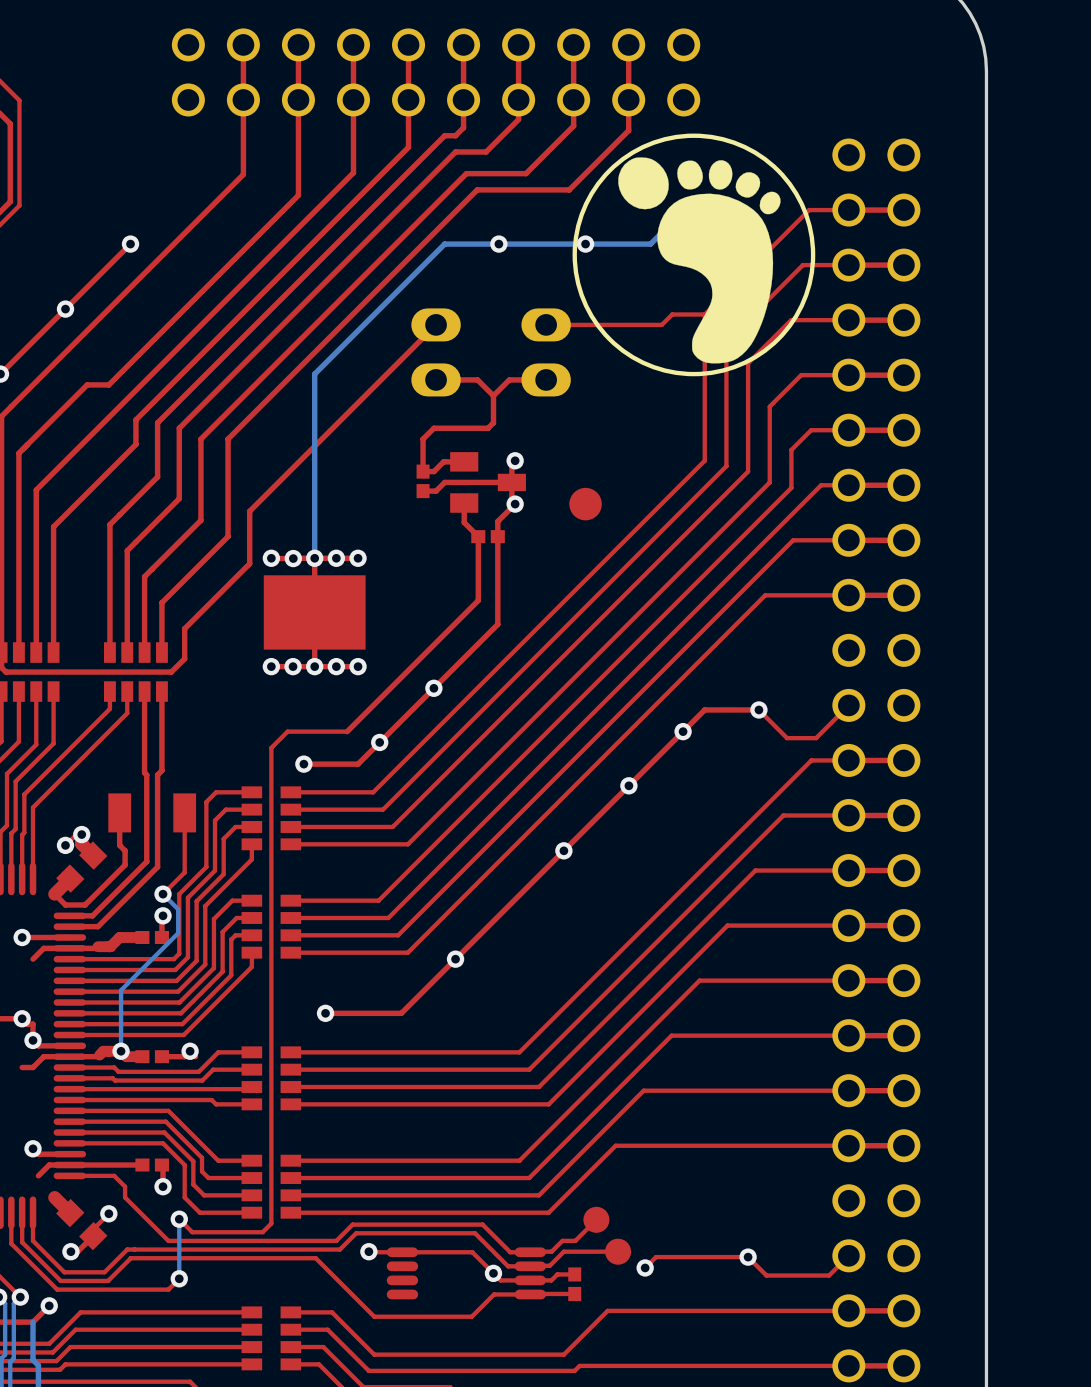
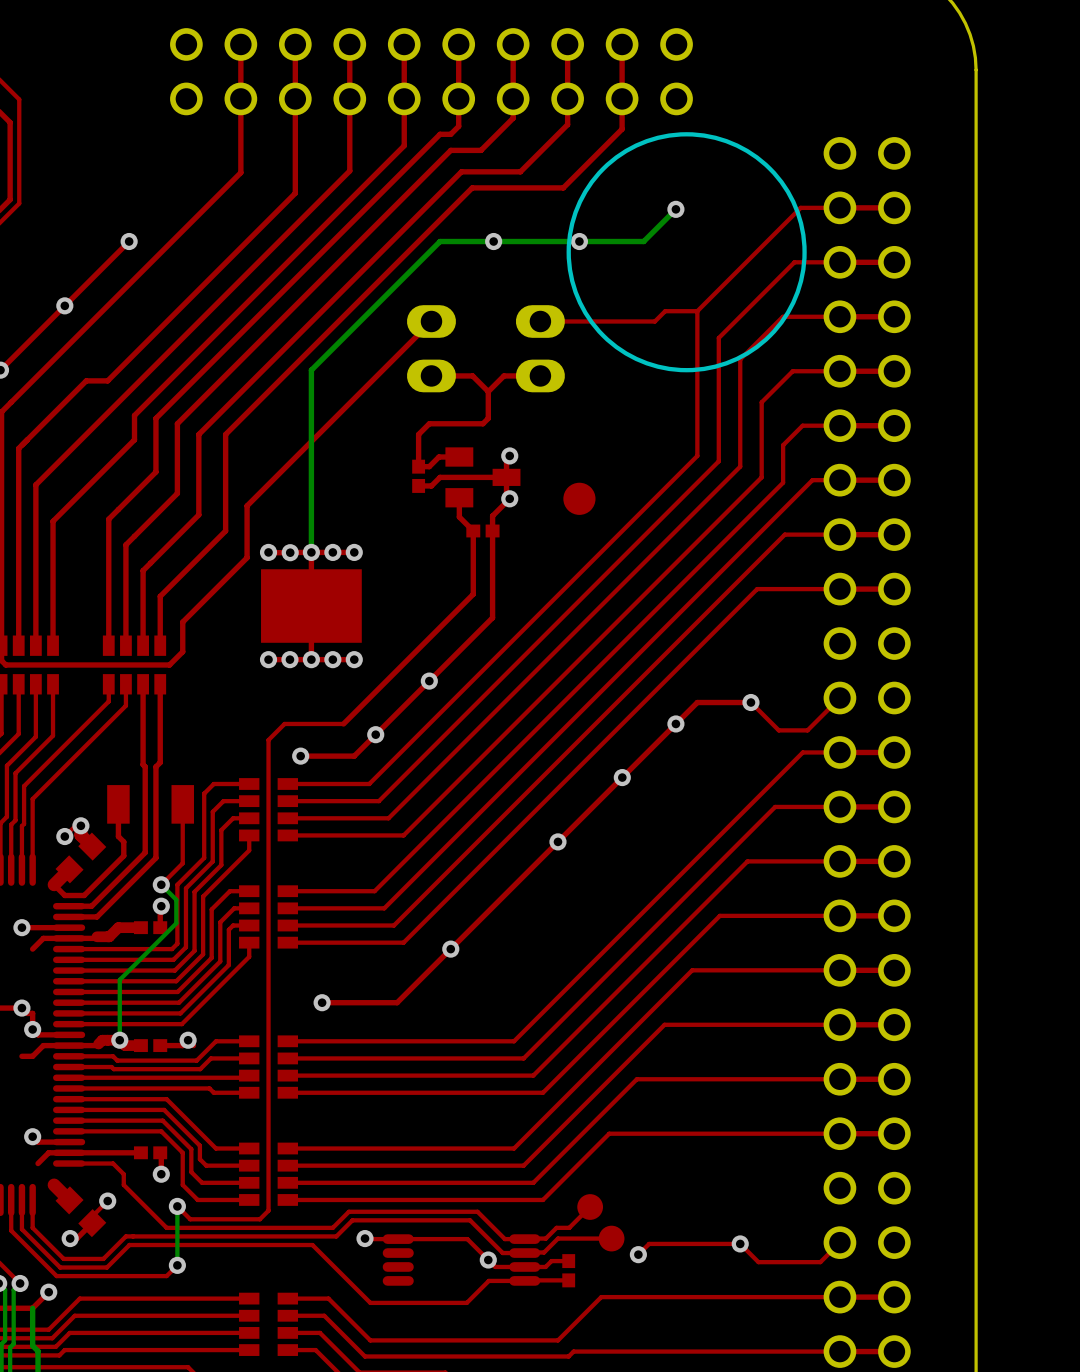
drawing: [618, 157, 781, 364] -> none

